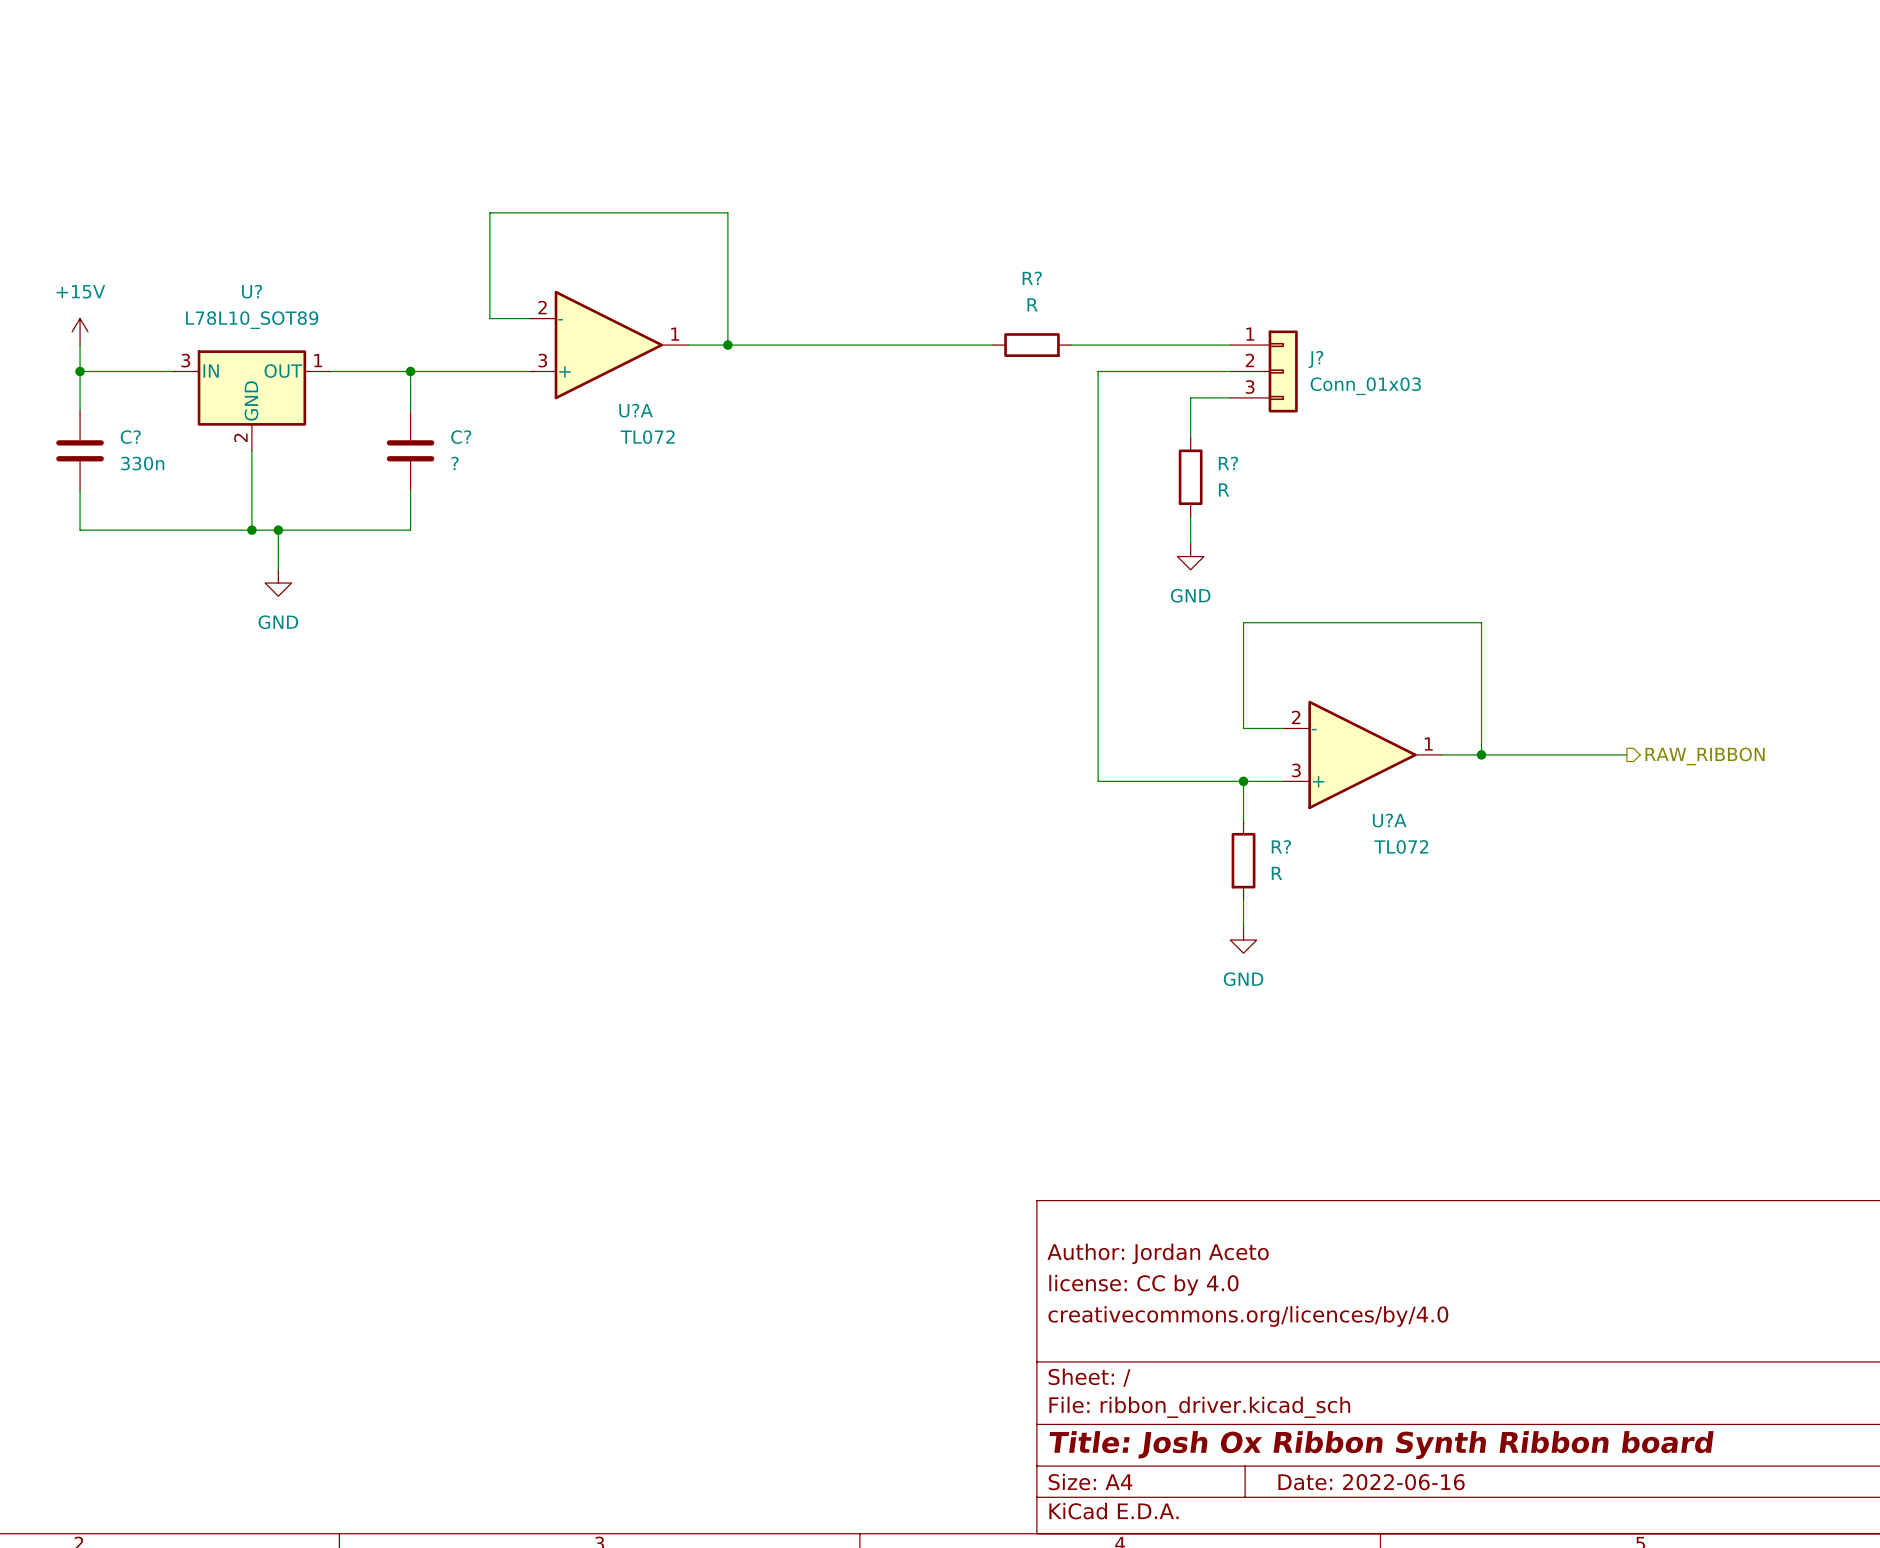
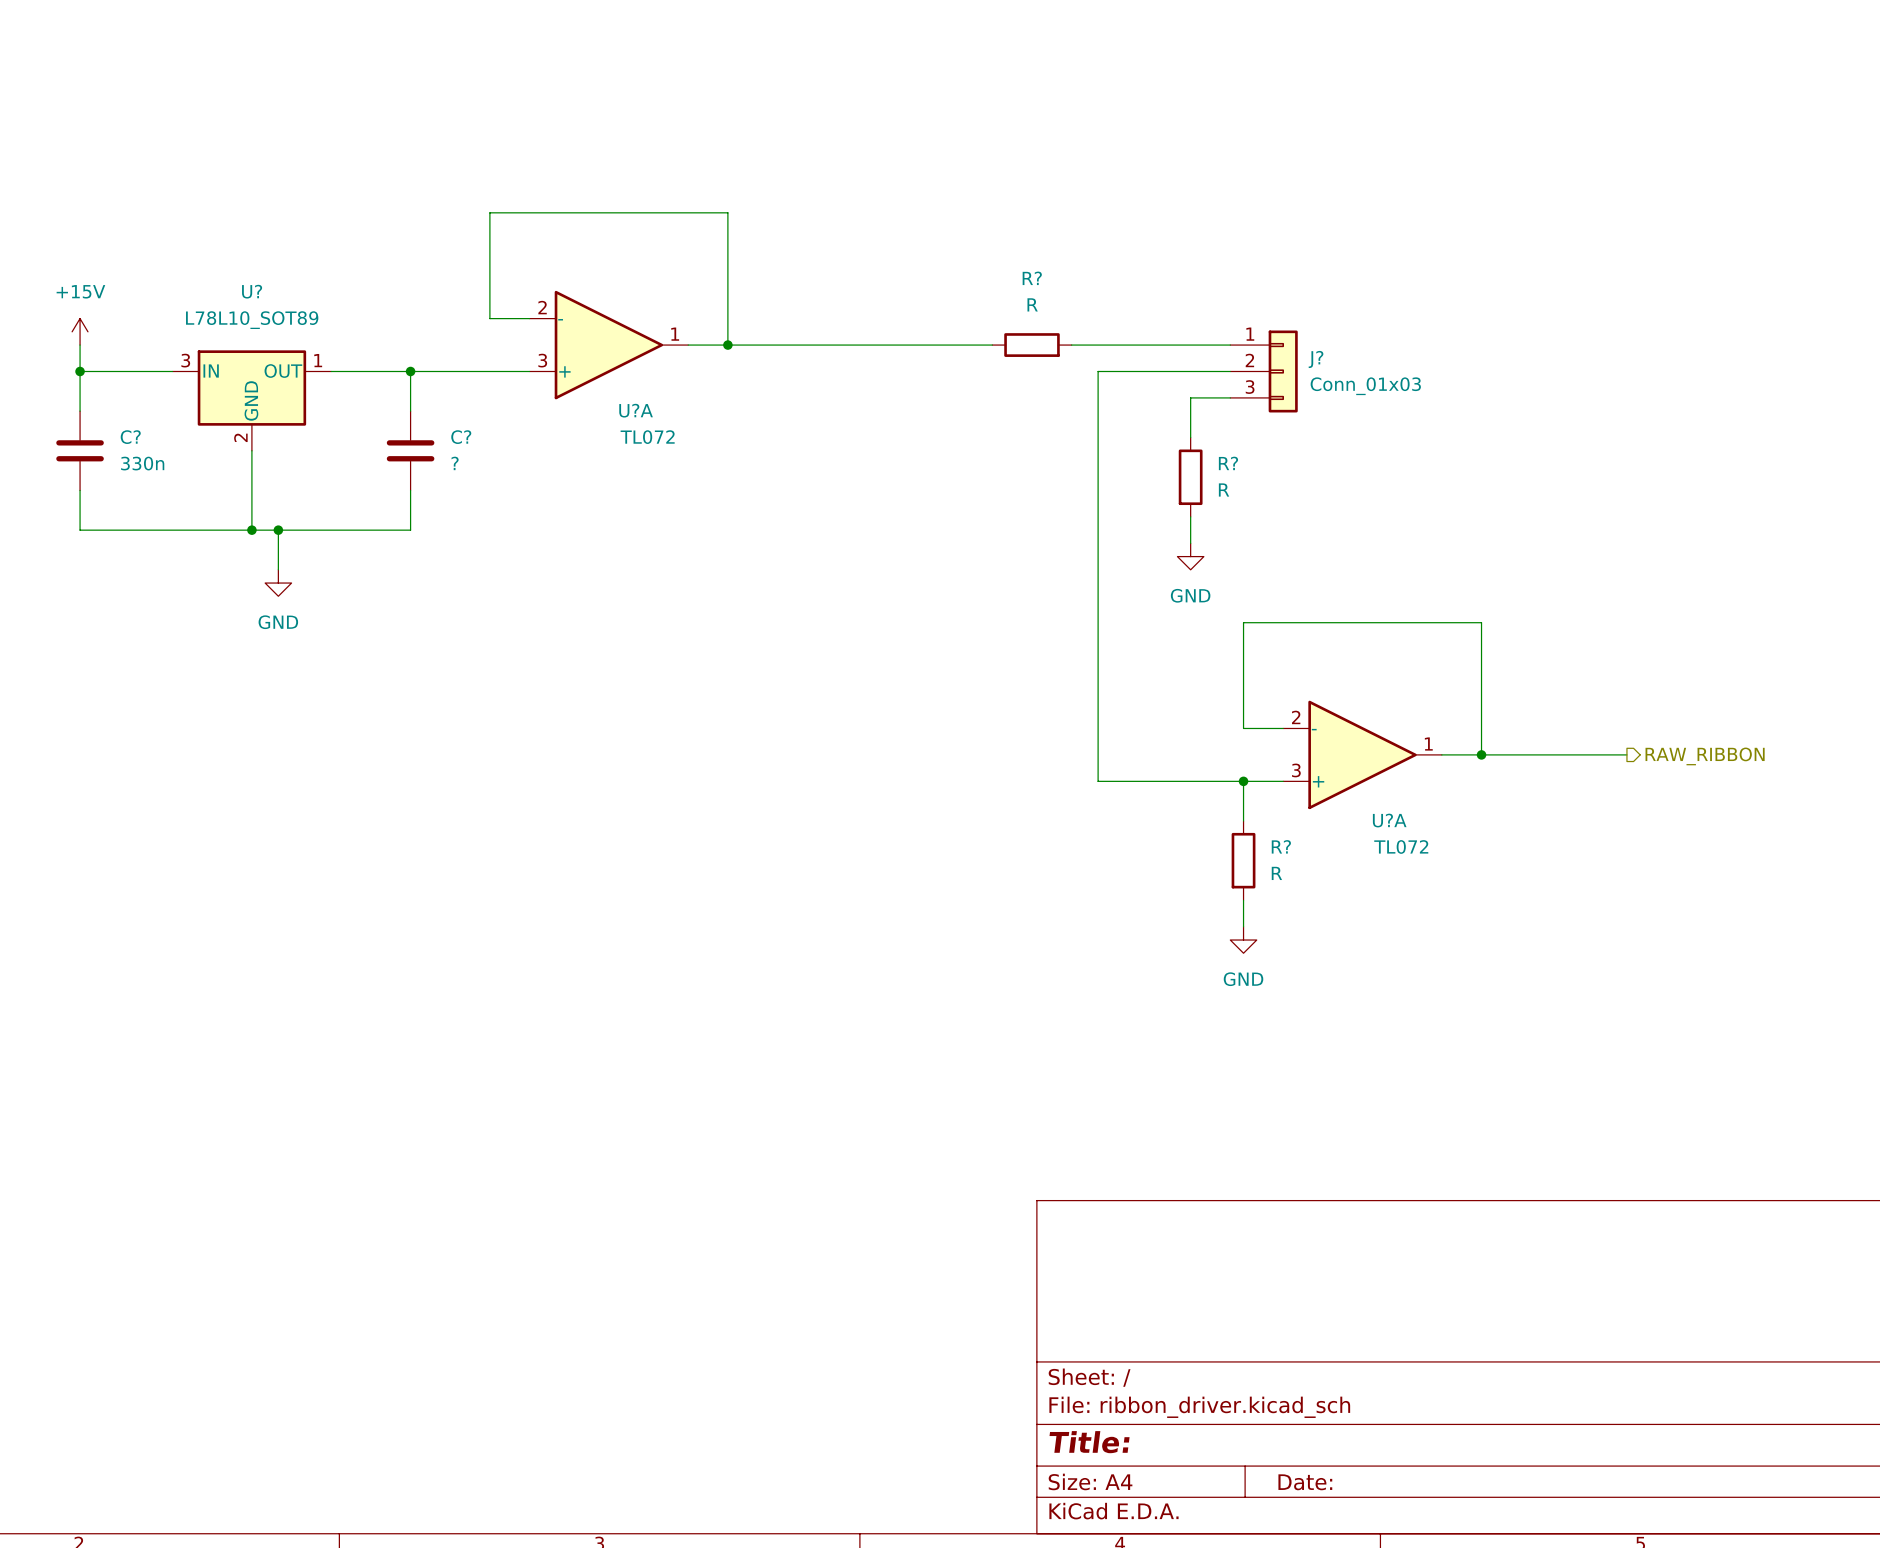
title block: Author: Jordan Aceto (1158, 1253) -> none
title block: license: CC by 4.0 (1143, 1285) -> none
title block: creativecommons.org/licences/by/4.0 (1248, 1316) -> none
title block: Title: Josh Ox Ribbon Synth Ribbon board (1381, 1445) -> Title: (1089, 1442)
title block: Date: 2022-06-16 (1371, 1482) -> Date: (1305, 1482)

